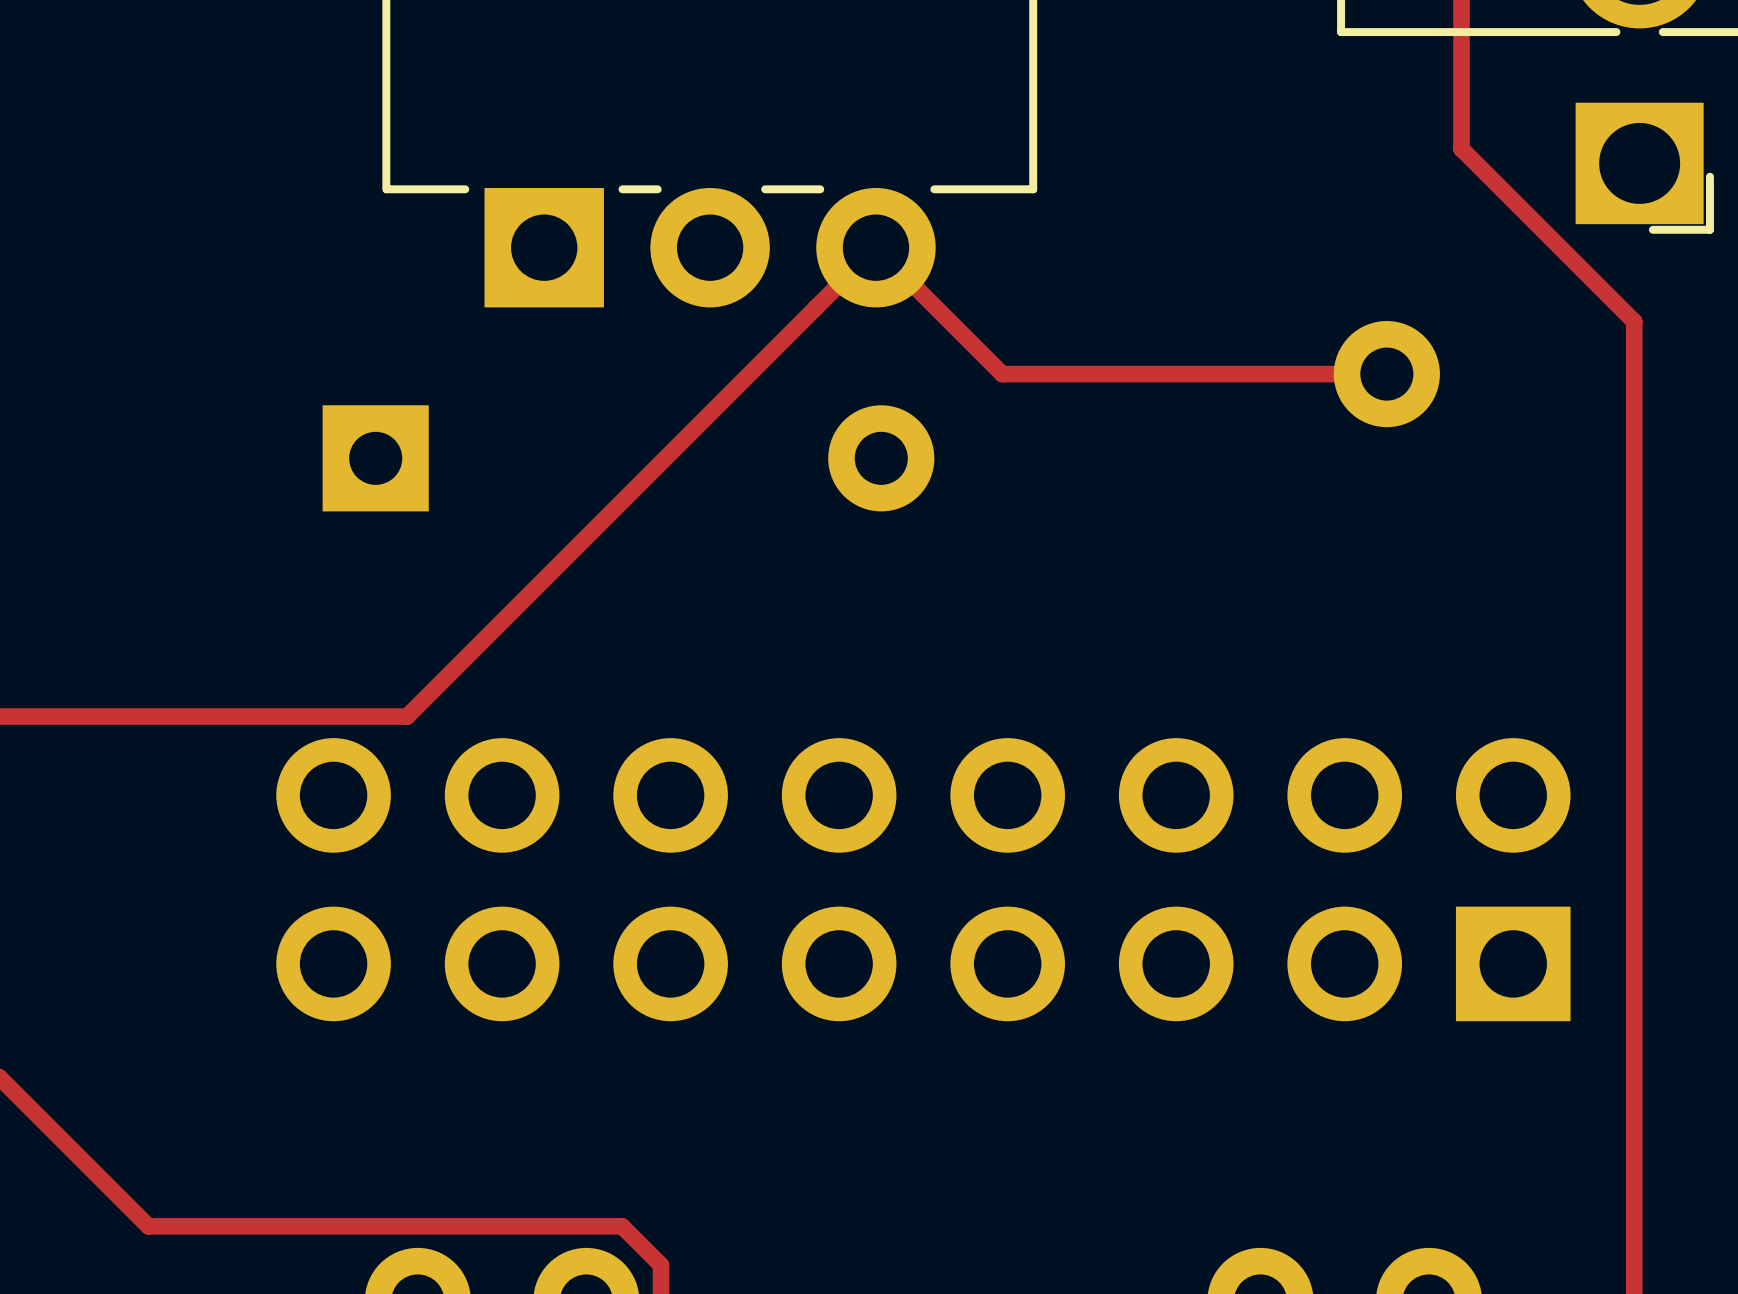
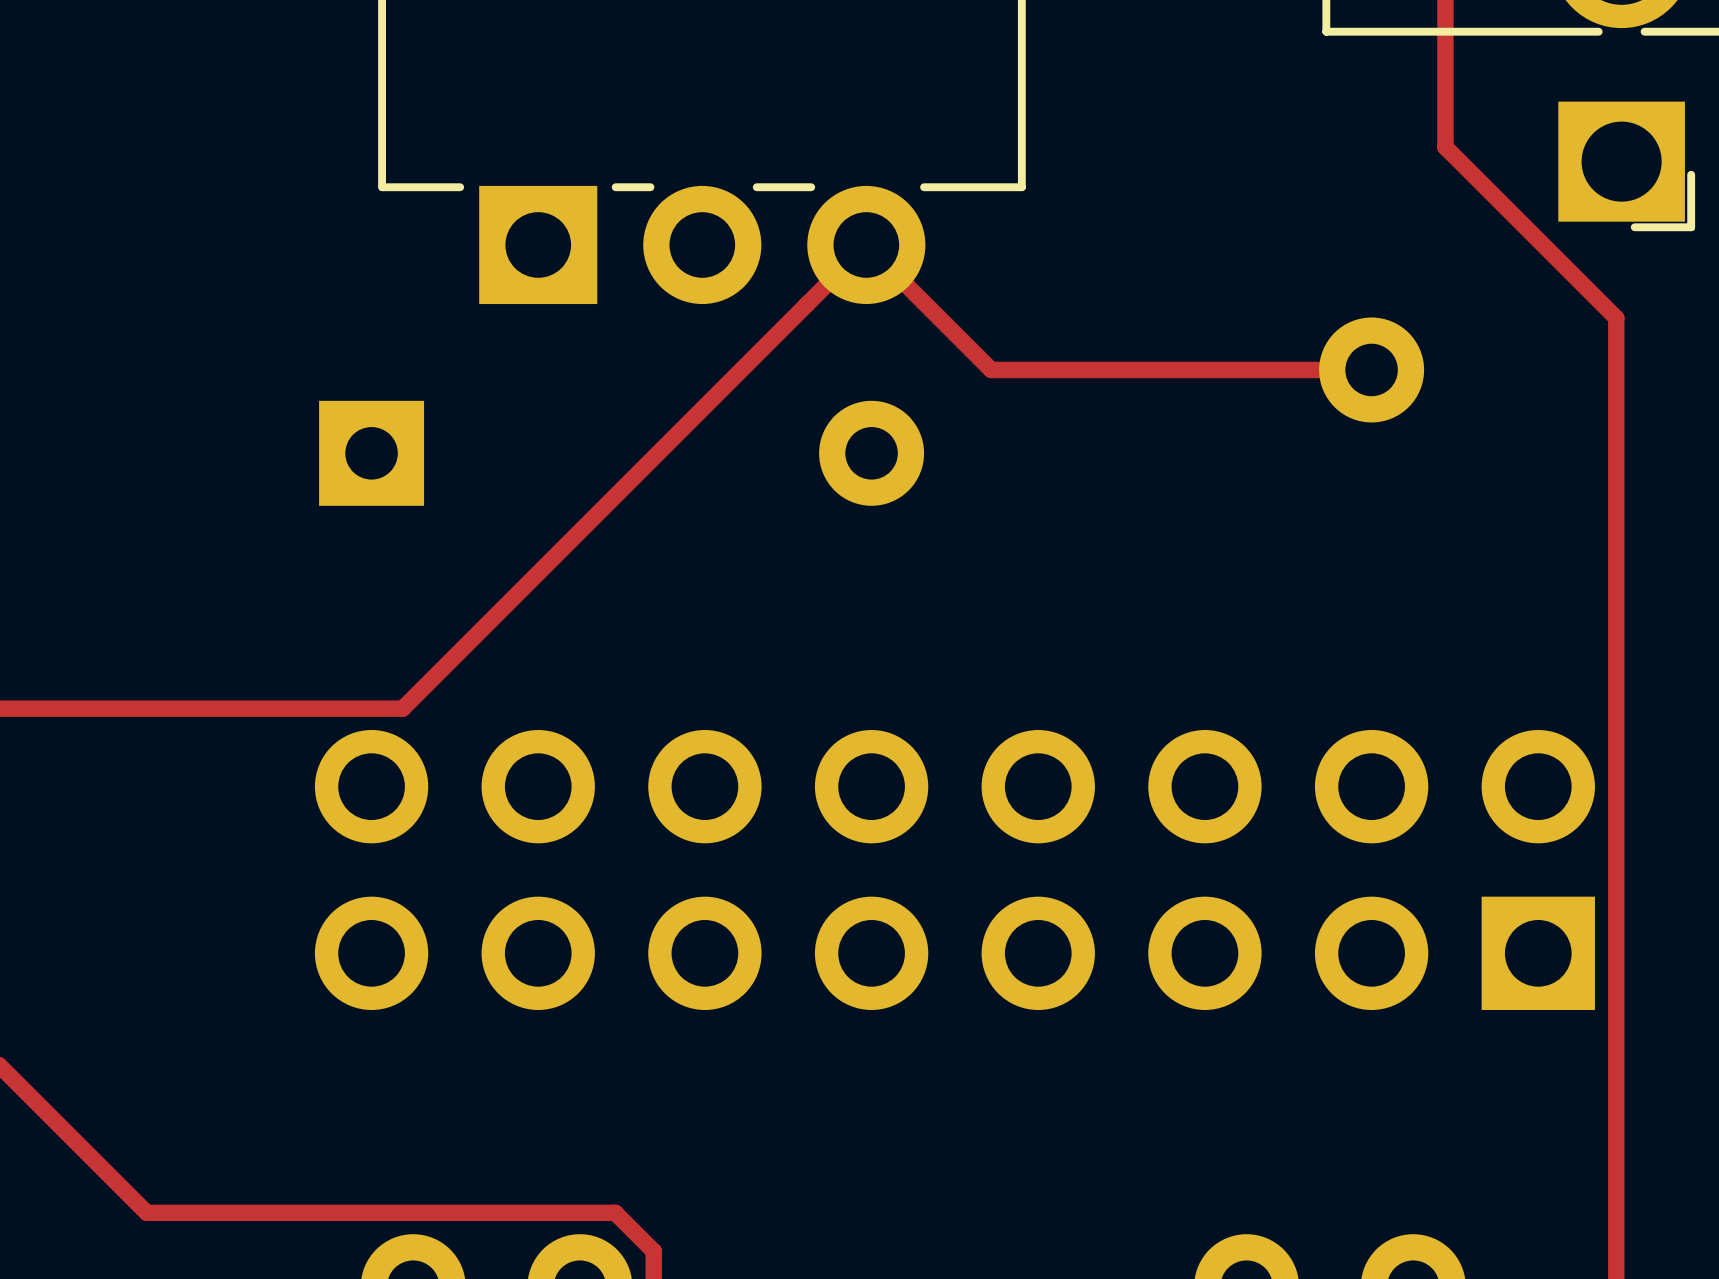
part position: (923, 879) -> (954, 870)

